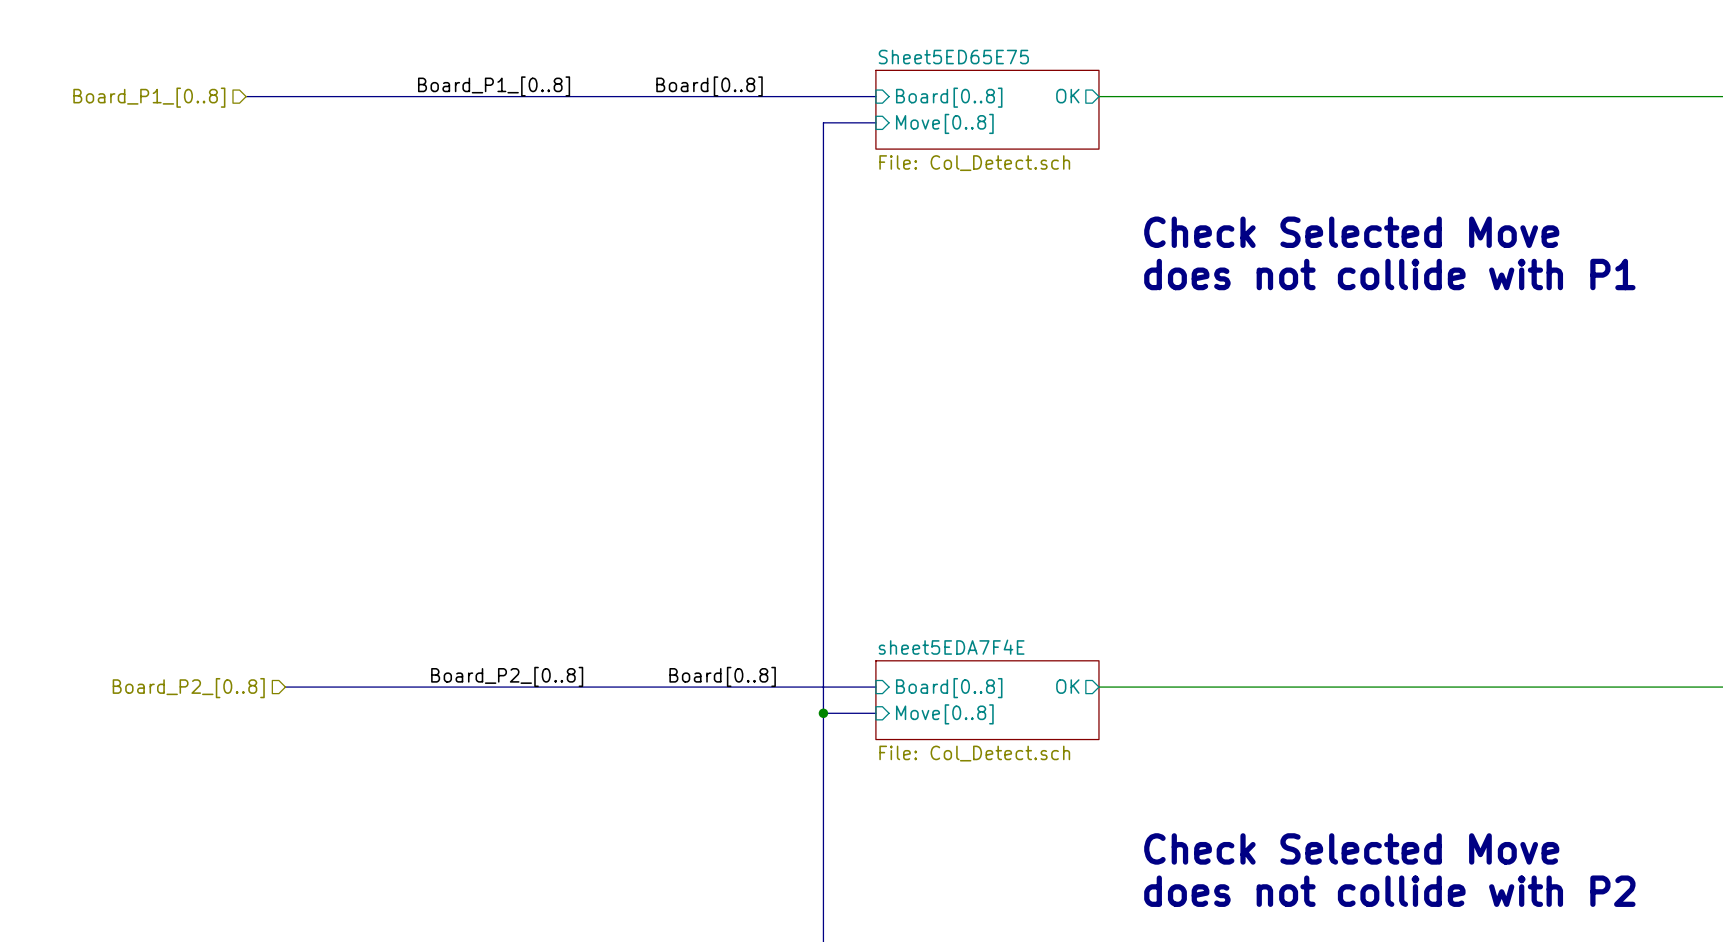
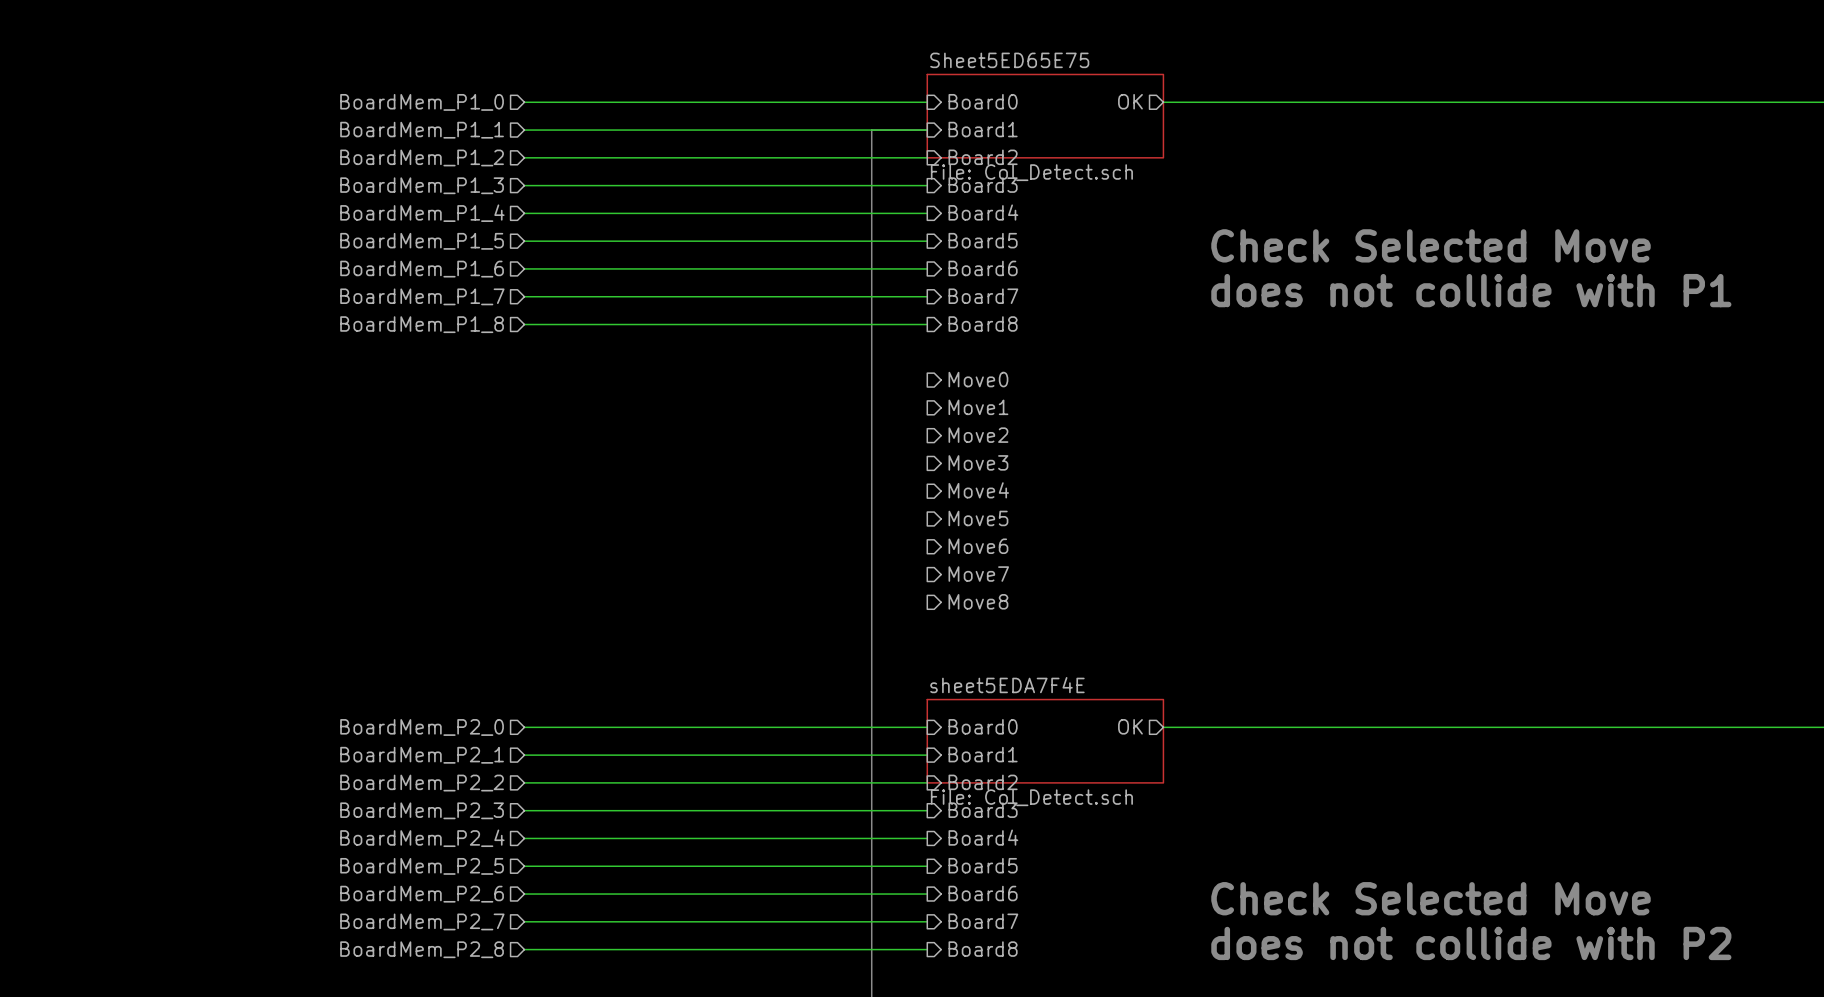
label: Board_P1_[0..8] (494, 86) -> none
label: Board[0..8] (709, 86) -> none
bus: (246, 96) (875, 96) -> none
hierarchical label: none -> BoardMem_P1_0 (422, 102)
hierarchical label: Board_P1_[0..8] (149, 97) -> none
sheet pin: Board[0..8] (949, 97) -> Board0 (983, 101)
hierarchical label: none -> BoardMem_P1_1 (422, 130)
wire: none -> (524, 130) (927, 130)
sheet pin: Move[0..8] (944, 123) -> Board1 (983, 129)
sheet pin: none -> Board2 (983, 157)
hierarchical label: none -> BoardMem_P1_2 (422, 157)
wire: none -> (524, 157) (927, 157)
sheet pin: none -> Board3 (983, 185)
hierarchical label: none -> BoardMem_P1_3 (422, 185)
wire: none -> (524, 185) (927, 185)
sheet pin: none -> Board4 (983, 212)
hierarchical label: none -> BoardMem_P1_4 (422, 213)
wire: none -> (524, 213) (927, 213)
hierarchical label: none -> BoardMem_P1_5 (422, 241)
wire: none -> (524, 241) (927, 241)
sheet pin: none -> Board5 (983, 240)
sheet pin: none -> Board6 (983, 268)
hierarchical label: none -> BoardMem_P1_6 (422, 269)
wire: none -> (524, 268) (927, 268)
sheet pin: none -> Board7 (983, 296)
hierarchical label: none -> BoardMem_P1_7 (422, 296)
wire: none -> (524, 296) (927, 296)
hierarchical label: none -> BoardMem_P1_8 (422, 324)
wire: none -> (524, 324) (927, 324)
sheet pin: none -> Board8 (983, 324)
sheet pin: none -> Move0 (978, 379)
sheet pin: none -> Move1 (978, 407)
sheet pin: none -> Move2 (978, 435)
sheet pin: none -> Move3 (978, 462)
sheet pin: none -> Move4 (978, 490)
sheet pin: none -> Move5 (978, 518)
sheet pin: none -> Move6 (978, 546)
sheet pin: none -> Move7 (978, 574)
sheet pin: none -> Move8 (978, 601)
label: Board_P2_[0..8] (507, 676) -> none
label: Board[0..8] (722, 676) -> none
bus: (285, 687) (875, 687) -> none
hierarchical label: none -> BoardMem_P2_0 (422, 727)
hierarchical label: Board_P2_[0..8] (188, 688) -> none
sheet pin: Board[0..8] (949, 688) -> Board0 (983, 726)
hierarchical label: none -> BoardMem_P2_1 (422, 755)
wire: none -> (524, 755) (927, 755)
bus: (823, 713) (875, 713) -> none
junction: (823, 713) -> none
sheet pin: Move[0..8] (944, 714) -> Board1 (983, 754)
hierarchical label: none -> BoardMem_P2_2 (422, 783)
wire: none -> (524, 782) (927, 782)
sheet pin: none -> Board2 (983, 782)
hierarchical label: none -> BoardMem_P2_3 (422, 810)
wire: none -> (524, 810) (927, 810)
sheet pin: none -> Board3 (983, 810)
hierarchical label: none -> BoardMem_P2_4 (422, 838)
sheet pin: none -> Board4 (983, 837)
wire: none -> (524, 838) (927, 838)
sheet pin: none -> Board5 (983, 865)
hierarchical label: none -> BoardMem_P2_5 (422, 866)
wire: none -> (524, 866) (927, 866)
hierarchical label: none -> BoardMem_P2_6 (422, 894)
wire: none -> (524, 894) (927, 894)
sheet pin: none -> Board6 (983, 893)
hierarchical label: none -> BoardMem_P2_7 (422, 921)
wire: none -> (524, 921) (927, 921)
sheet pin: none -> Board7 (983, 921)
wire: none -> (524, 949) (927, 949)
sheet pin: none -> Board8 (983, 949)
hierarchical label: none -> BoardMem_P2_8 (422, 949)

